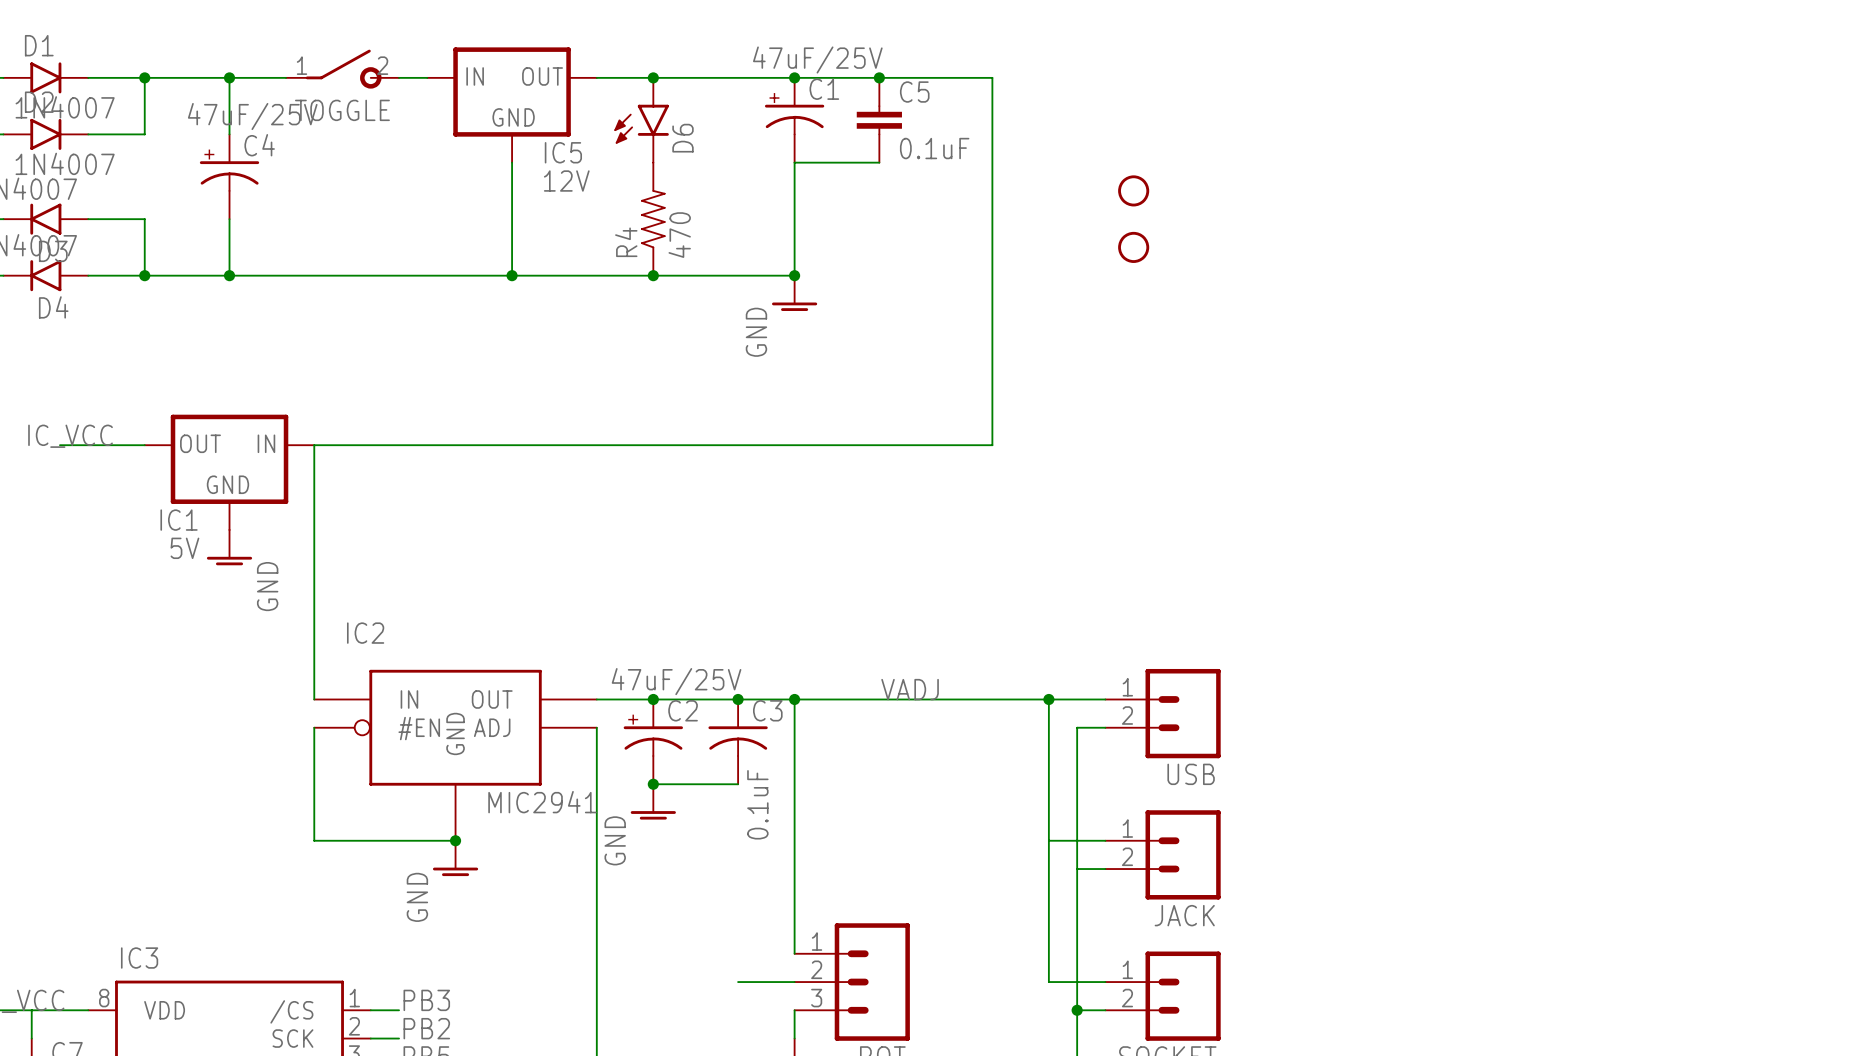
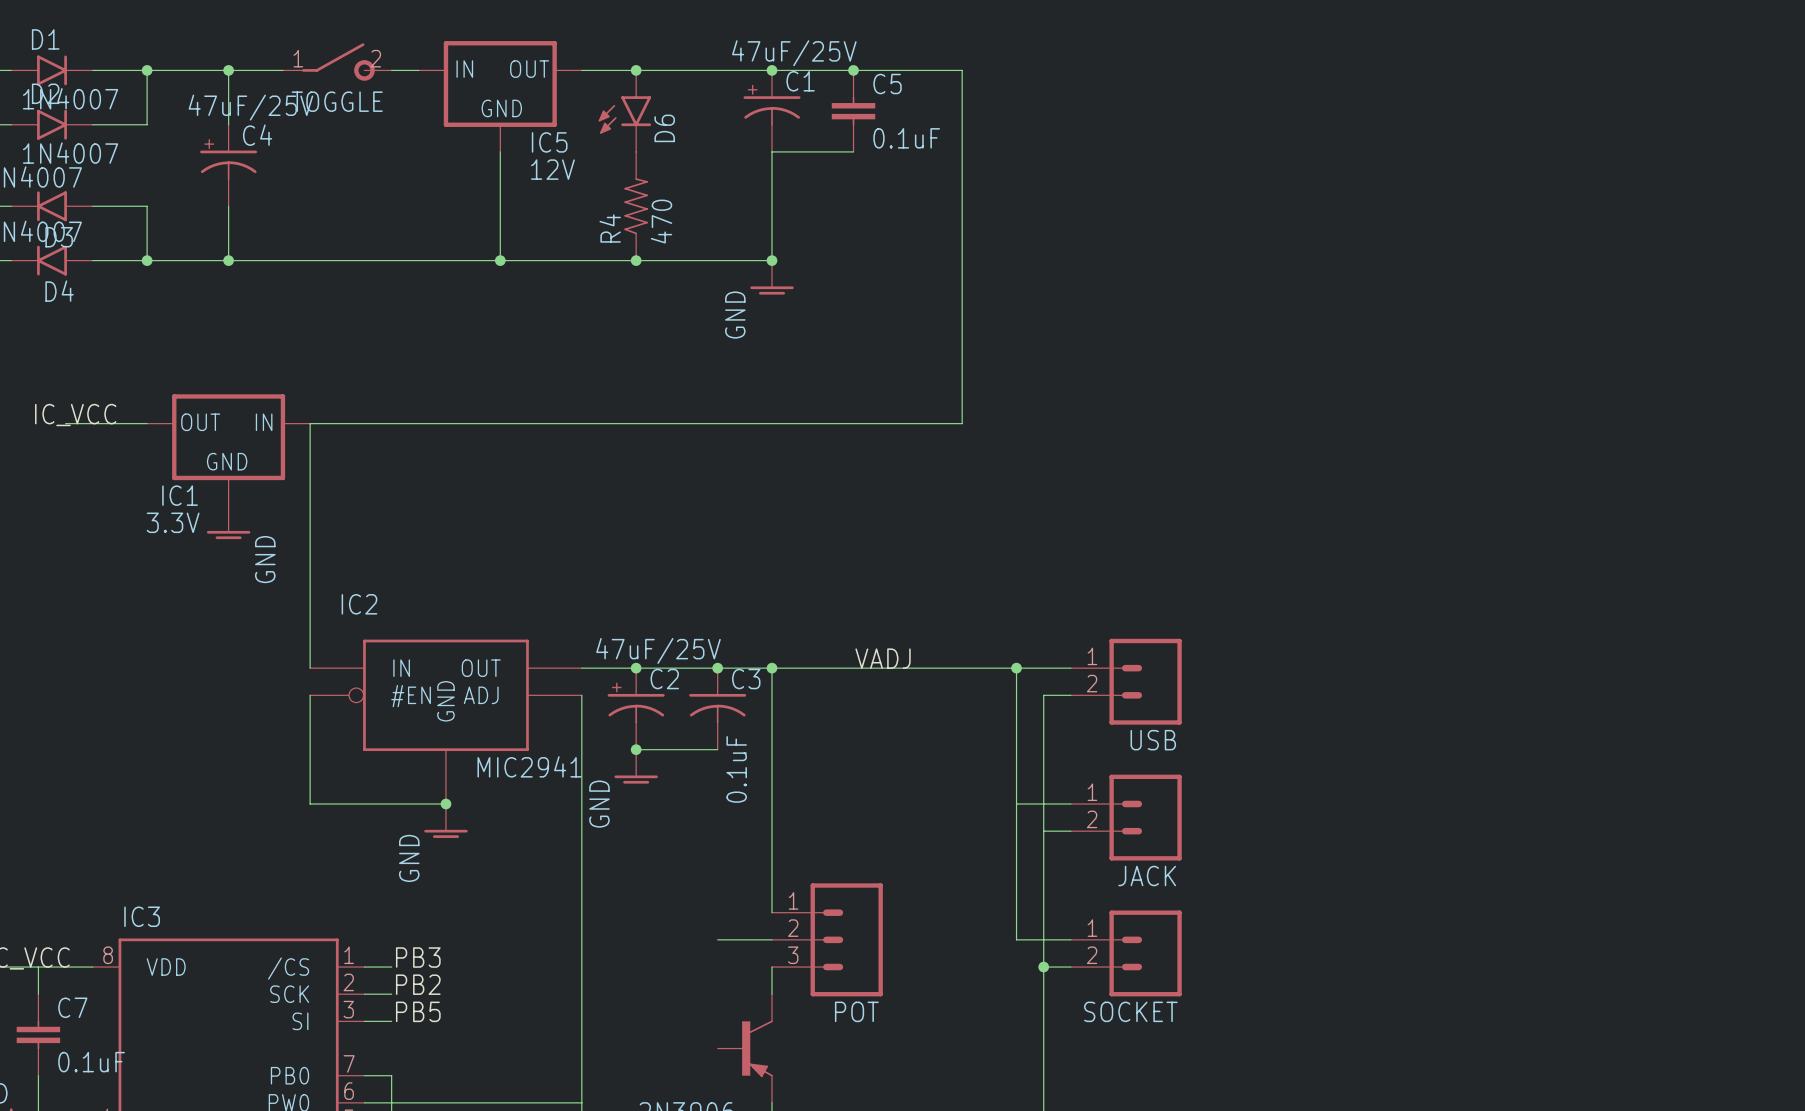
part: (1133, 190) -> none
part: (1133, 247) -> none
IC1 value: 5V (184, 548) -> 3.3V (173, 522)

